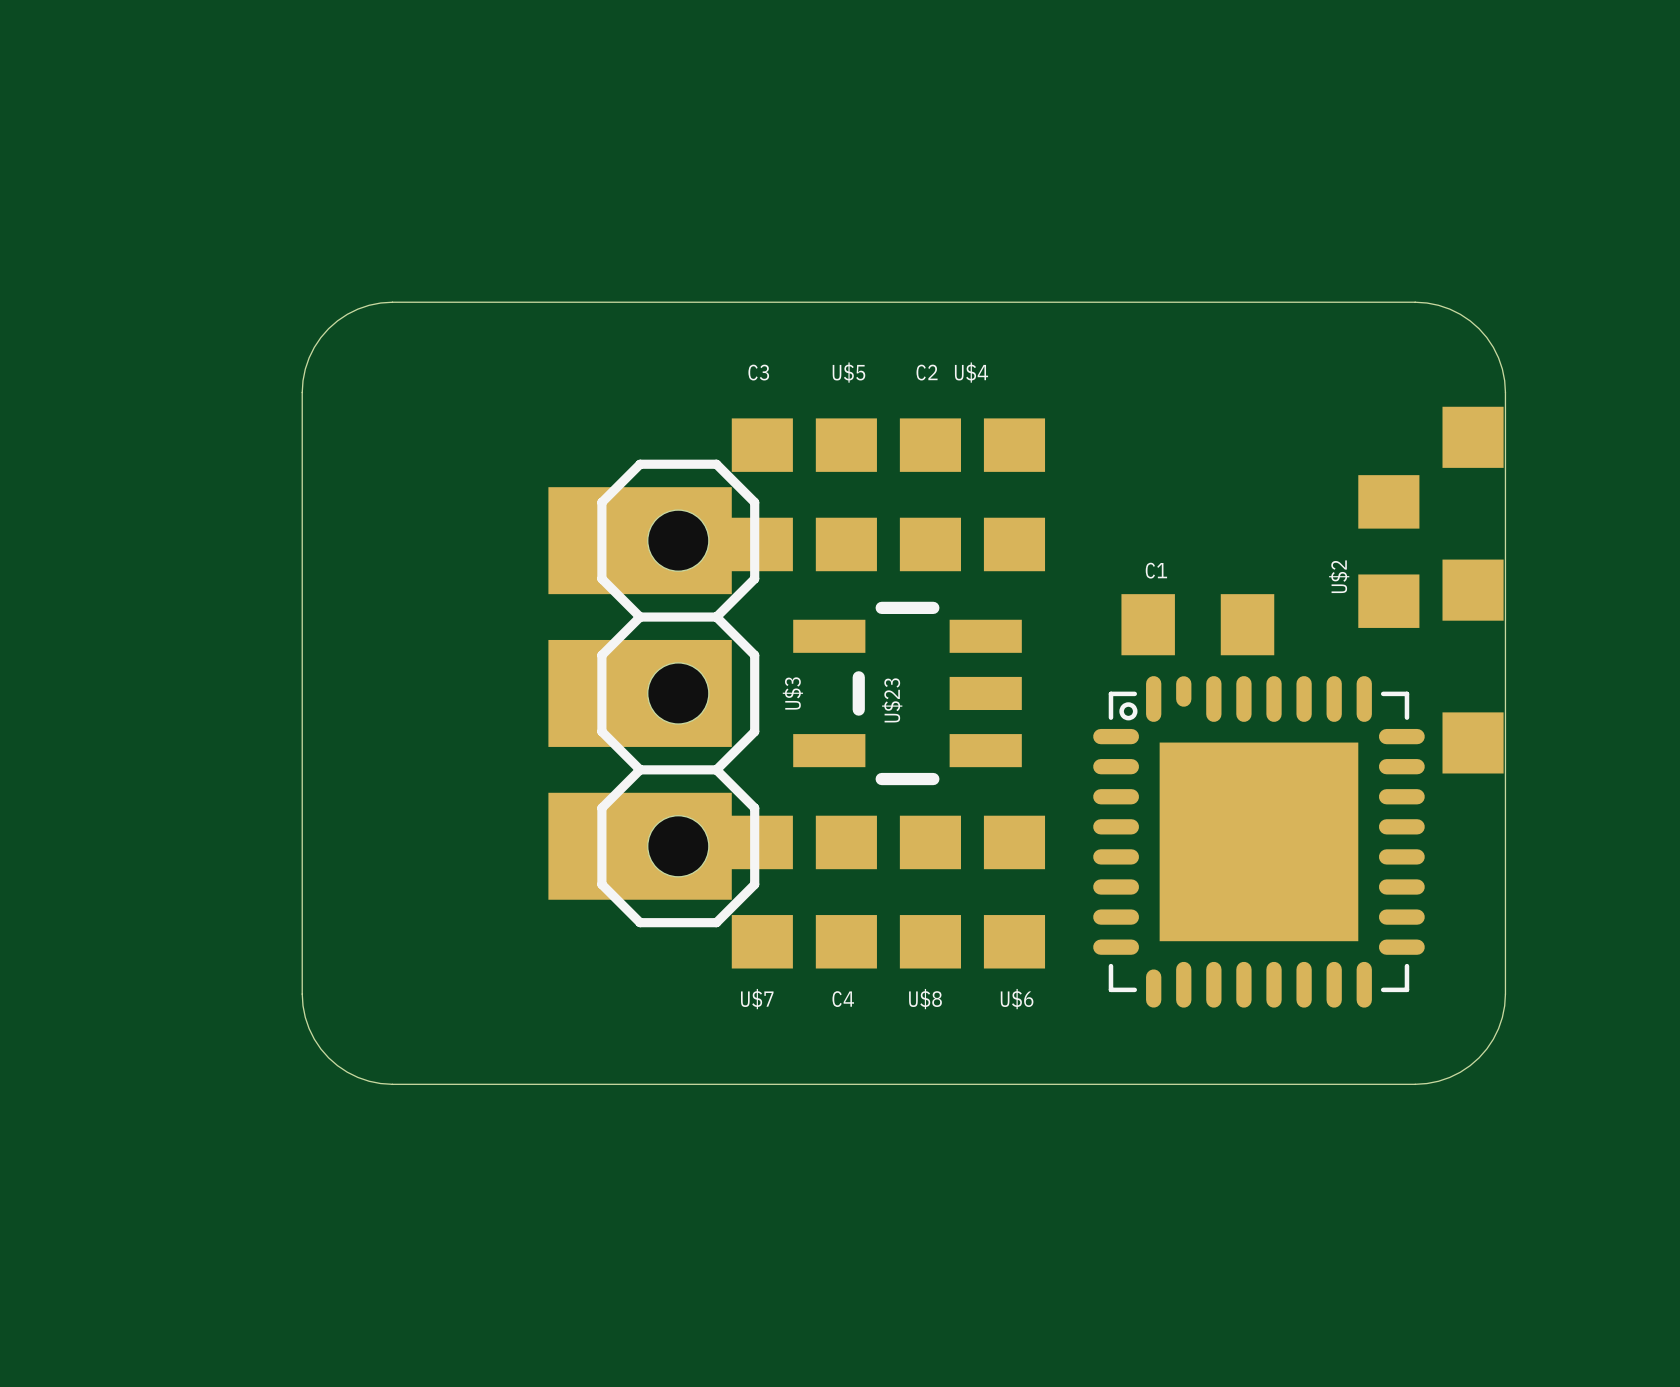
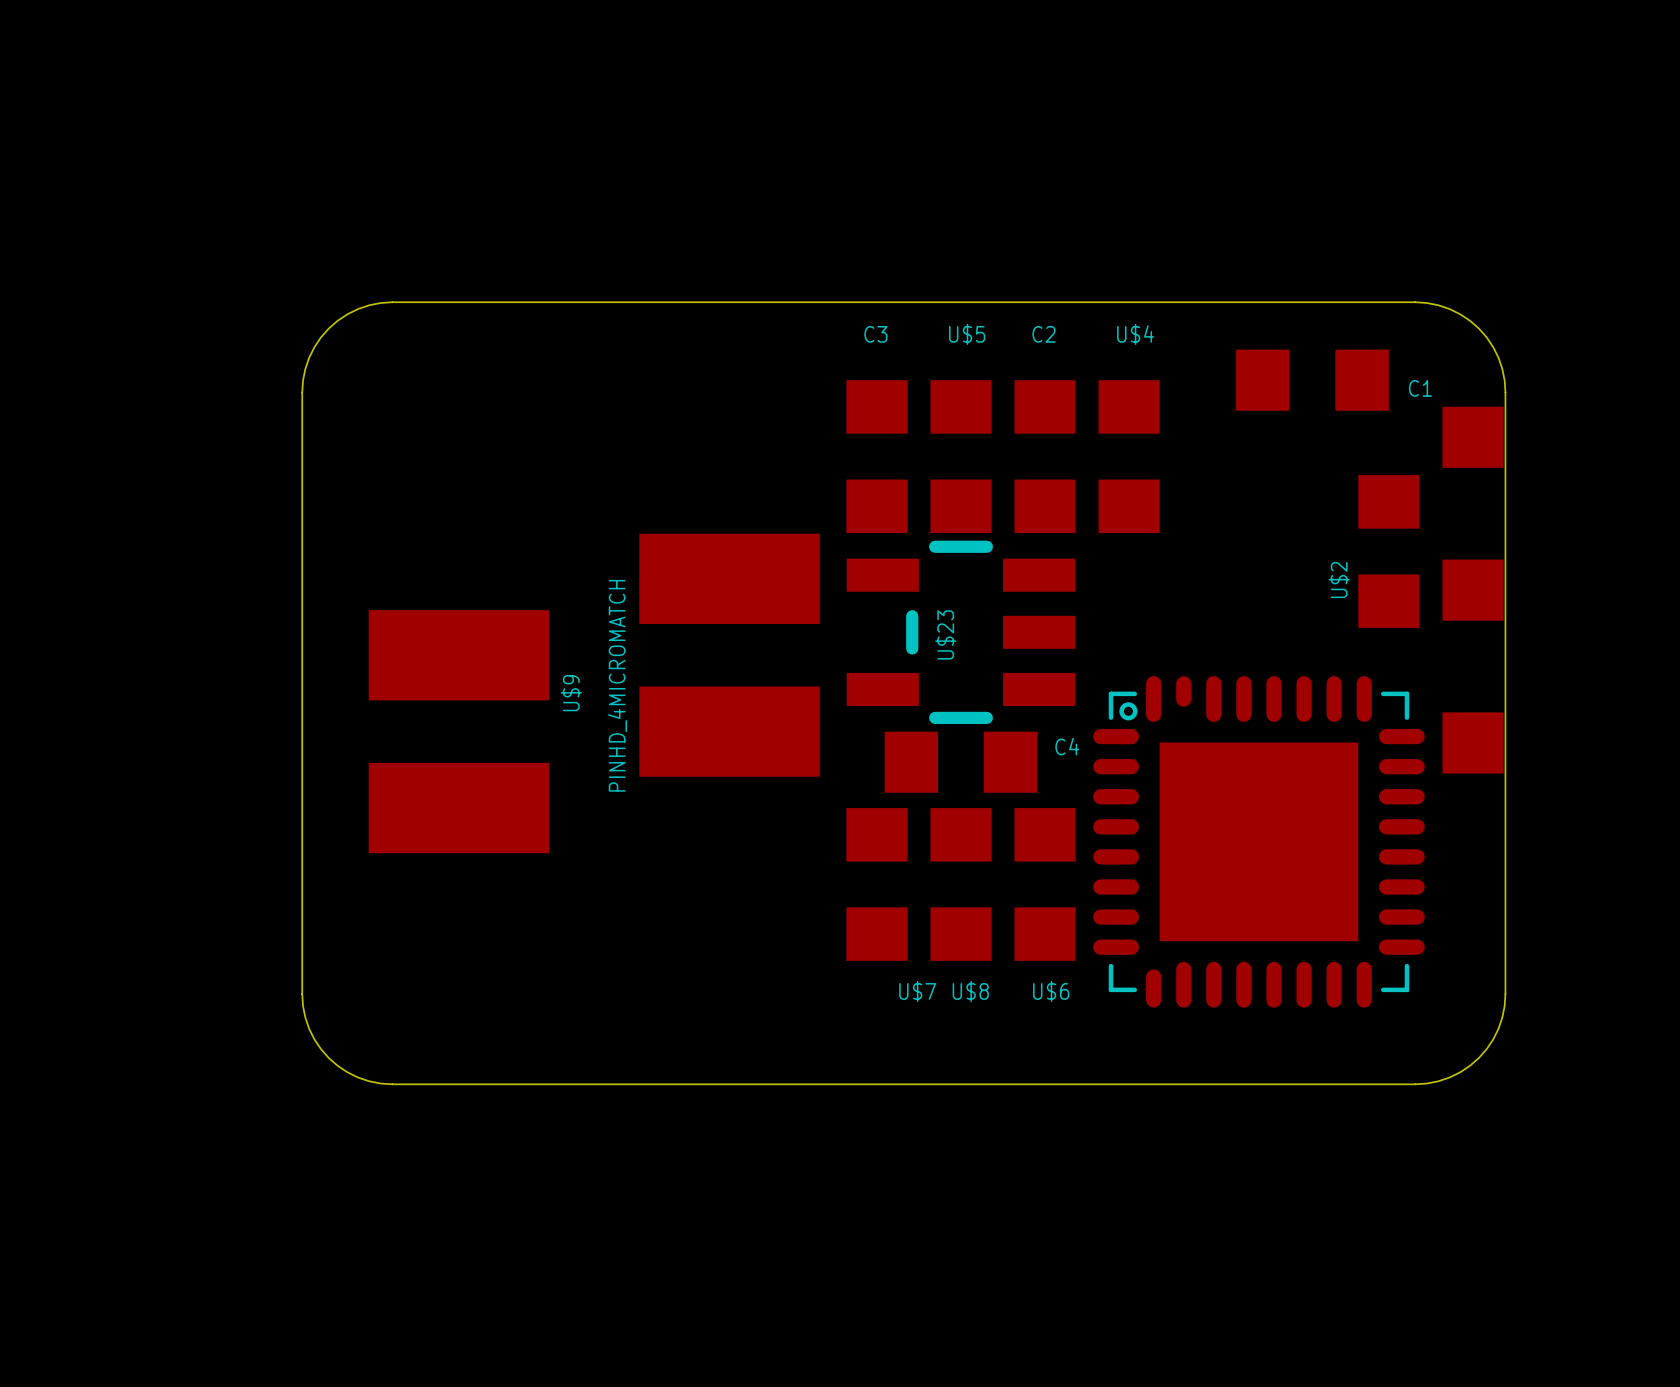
U$4 name position: U$4 (971, 372) -> U$4 (1135, 334)
C3 position: (762, 494) -> (876, 456)
U$5 position: (846, 494) -> (960, 456)
C2 position: (930, 494) -> (1045, 456)
U$4 position: (1014, 494) -> (1129, 456)
C1 name position: C1 (1156, 570) -> C1 (1420, 388)
C1 position: (1197, 624) -> (1312, 380)
U$9: none -> PINHD_4MICROMATCH (594, 693)
U$3: (653, 693) -> none
U$23 position: (907, 693) -> (960, 632)
U$7 position: (762, 892) -> (876, 884)
C4 rotation: 0° (846, 892) -> 90° clockwise (960, 762)
C4 position: (846, 892) -> (960, 762)
U$8 position: (930, 892) -> (960, 884)
U$6 position: (1014, 892) -> (1045, 884)
U$7 name position: U$7 (757, 999) -> U$7 (917, 991)
C4 name position: C4 (843, 999) -> C4 (1067, 746)
U$8 name position: U$8 (925, 999) -> U$8 (970, 991)

